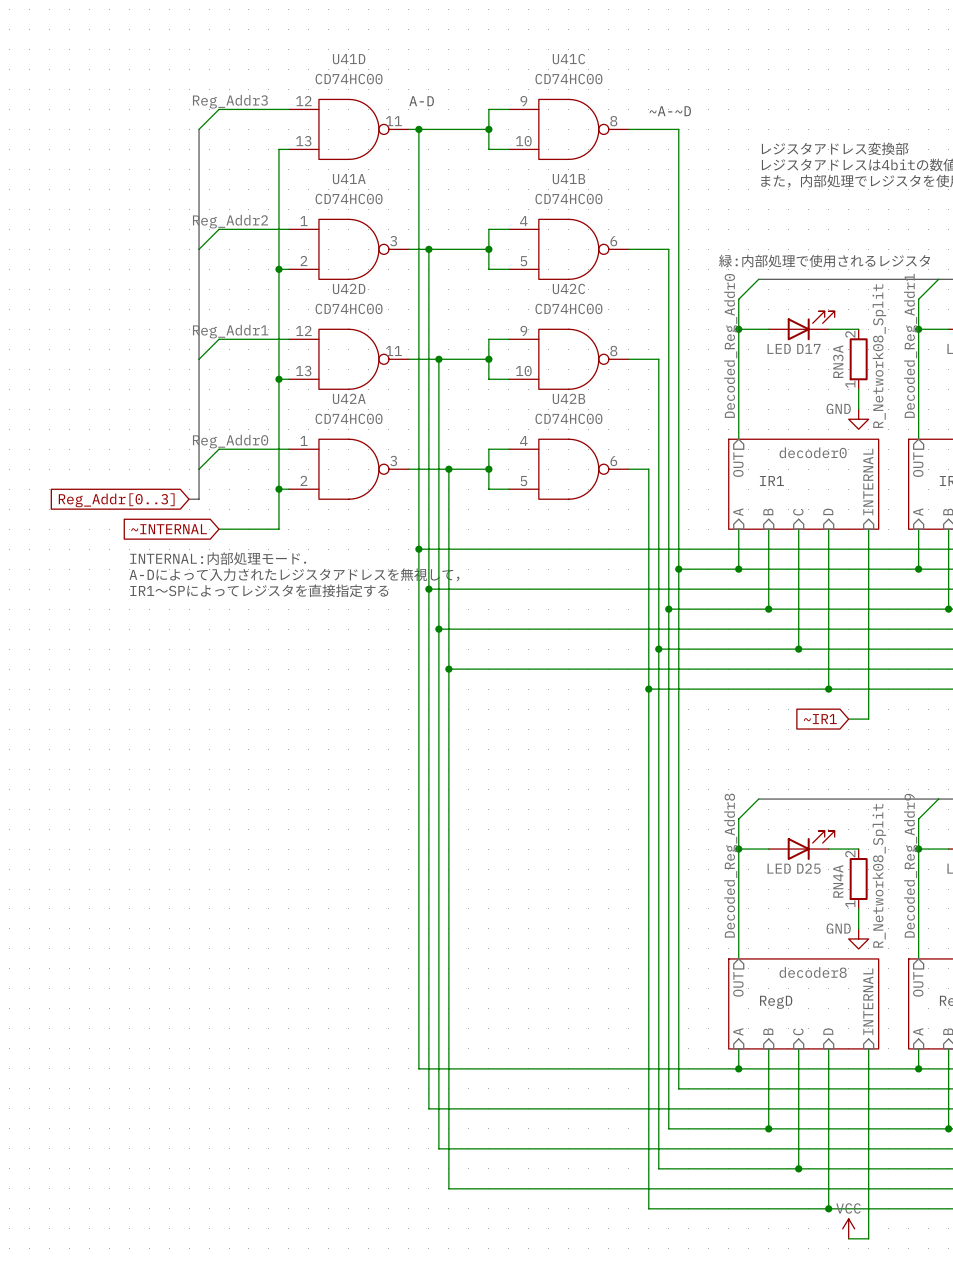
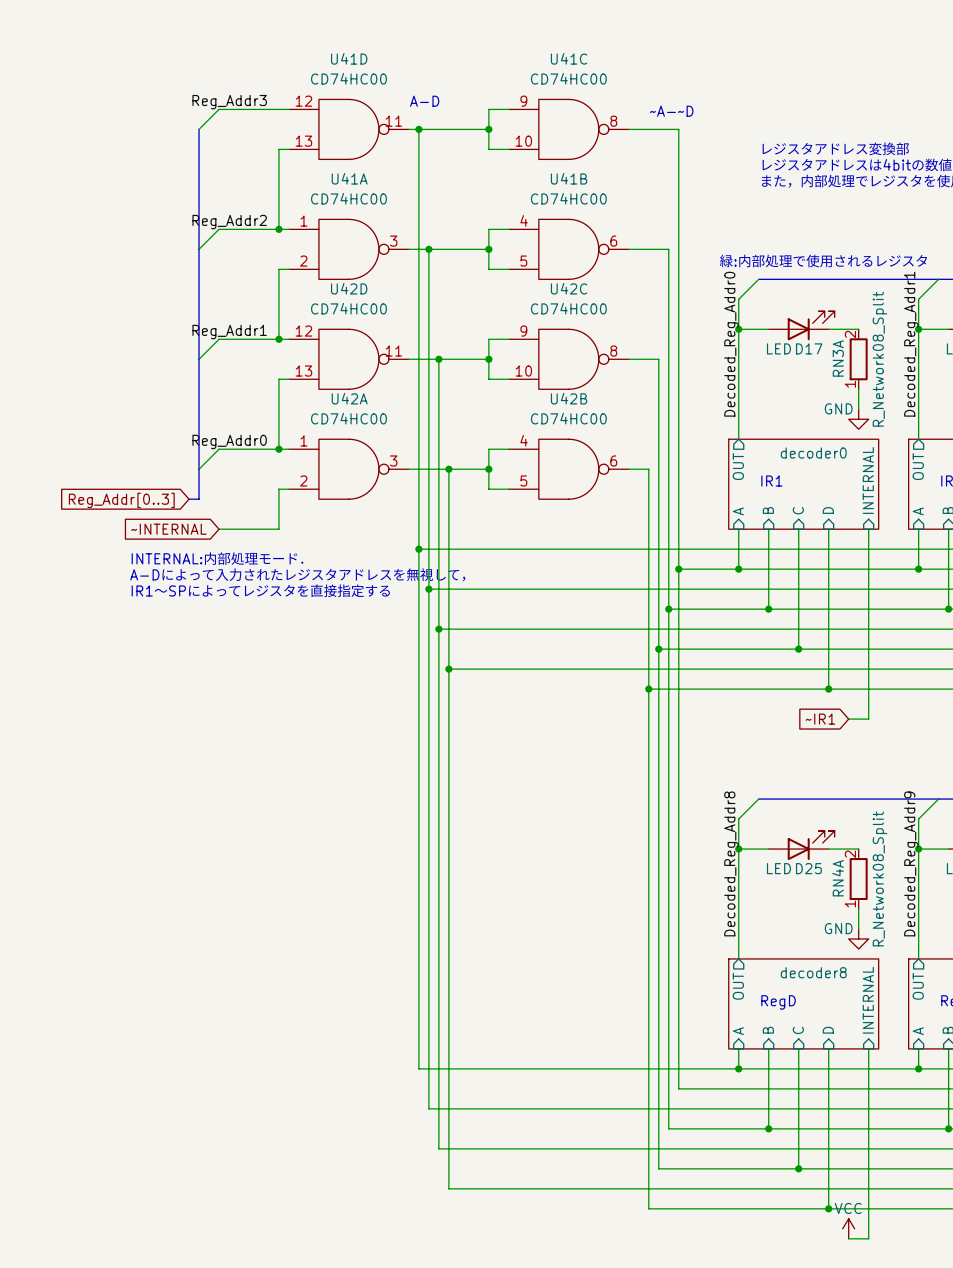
wire: (278, 229) (278, 269) -> none
junction: none -> (278, 229)
junction: (278, 269) -> none
wire: (278, 339) (278, 379) -> none
junction: none -> (278, 339)
junction: (278, 379) -> none
wire: (278, 449) (278, 489) -> none
junction: none -> (278, 449)
junction: (278, 489) -> none

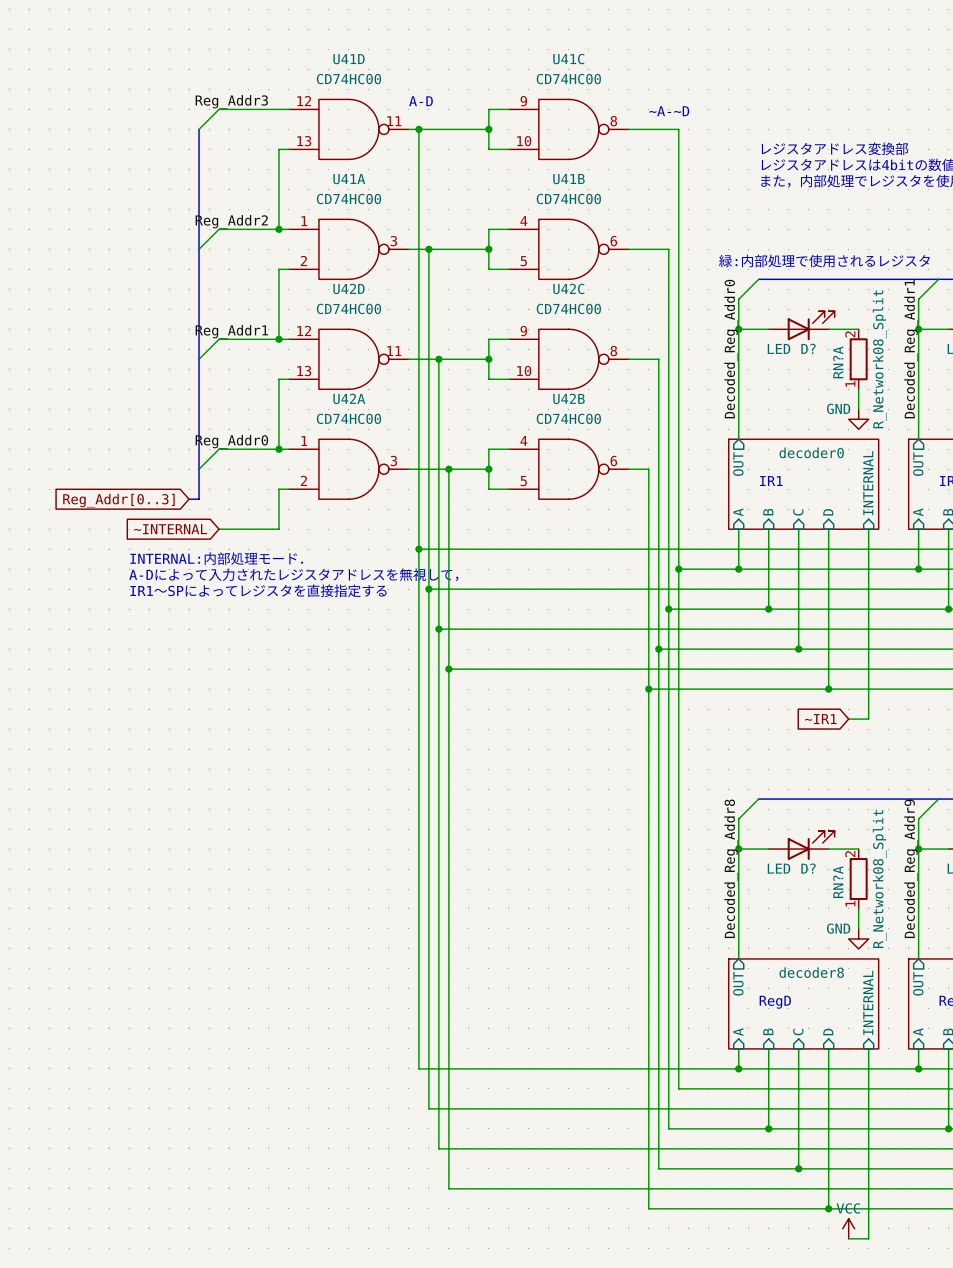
D17 name: D17 (809, 348) -> D? (808, 348)
RN3A name: RN3A (838, 358) -> RN?A (838, 362)
D25 name: D25 (808, 868) -> D? (808, 868)
RN4A name: RN4A (838, 878) -> RN?A (838, 882)

